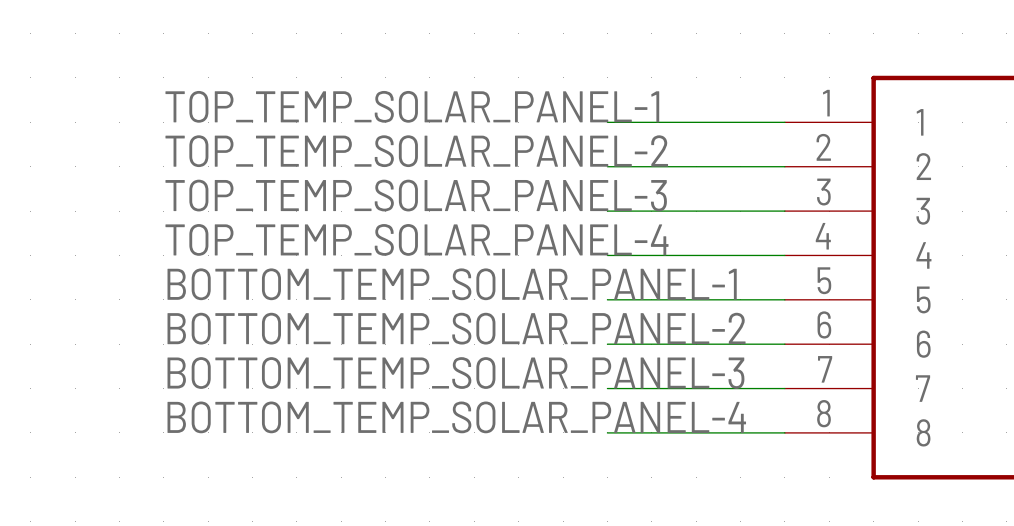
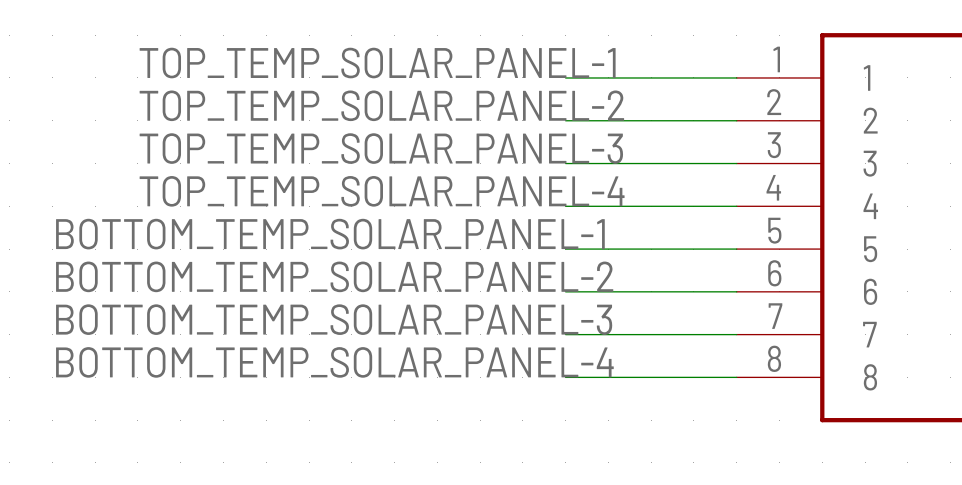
label position: BOTTOM_TEMP_SOLAR_PANEL-1 (452, 284) -> BOTTOM_TEMP_SOLAR_PANEL-1 (330, 234)
label position: BOTTOM_TEMP_SOLAR_PANEL-2 (456, 328) -> BOTTOM_TEMP_SOLAR_PANEL-2 (334, 276)
label position: BOTTOM_TEMP_SOLAR_PANEL-3 (455, 373) -> BOTTOM_TEMP_SOLAR_PANEL-3 (334, 319)
label position: BOTTOM_TEMP_SOLAR_PANEL-4 (456, 417) -> BOTTOM_TEMP_SOLAR_PANEL-4 (334, 362)

